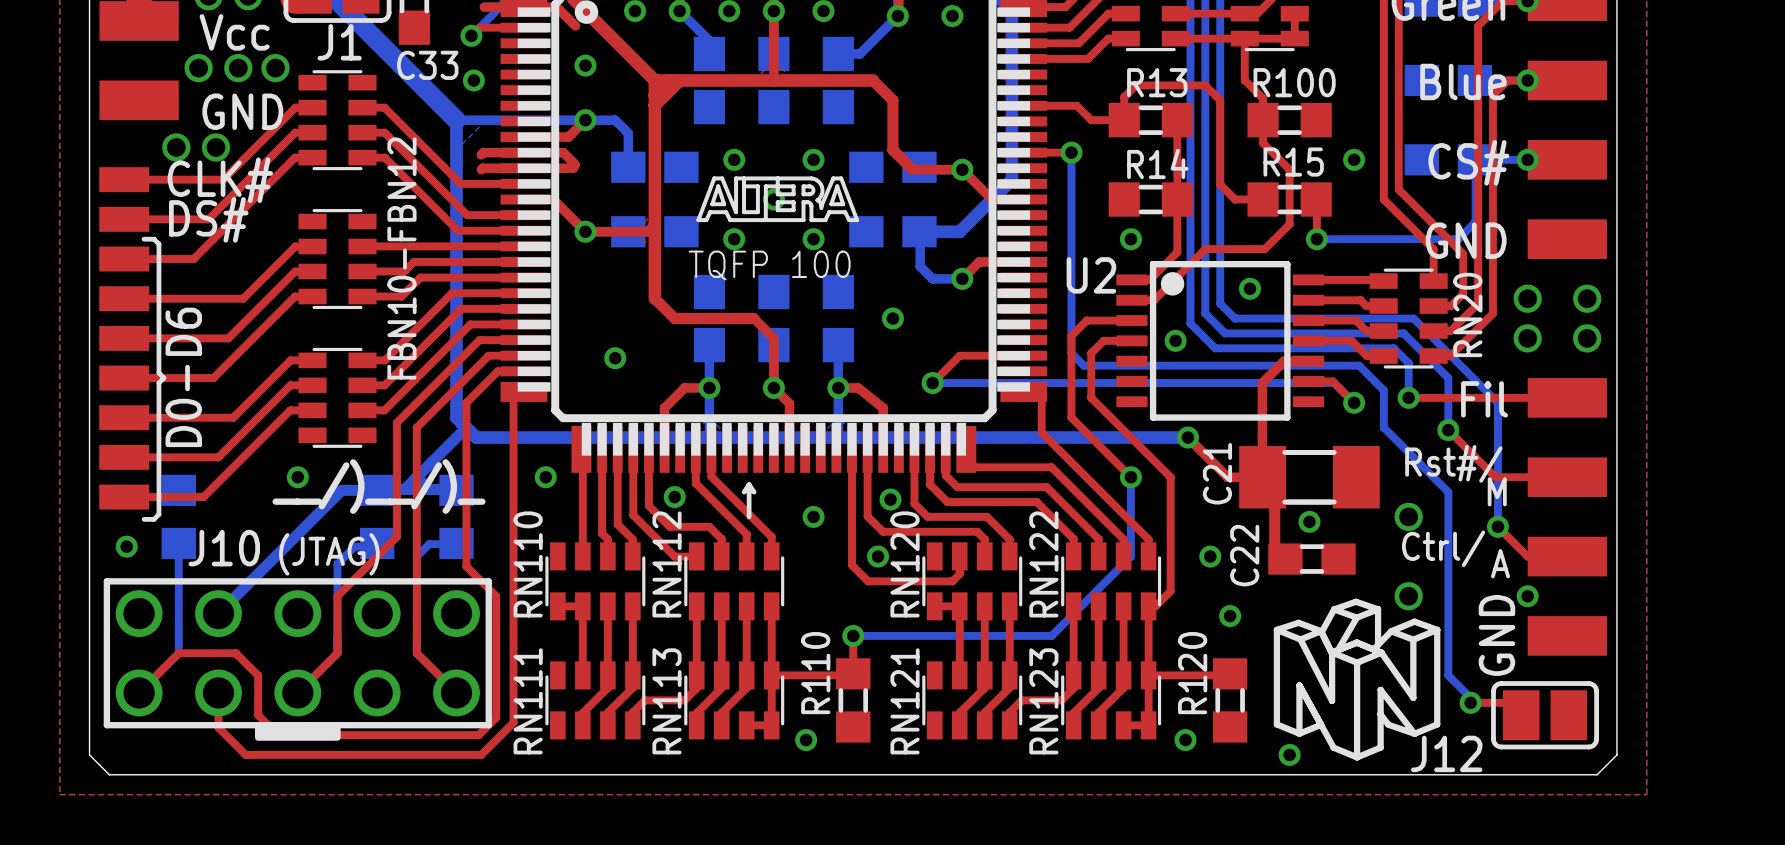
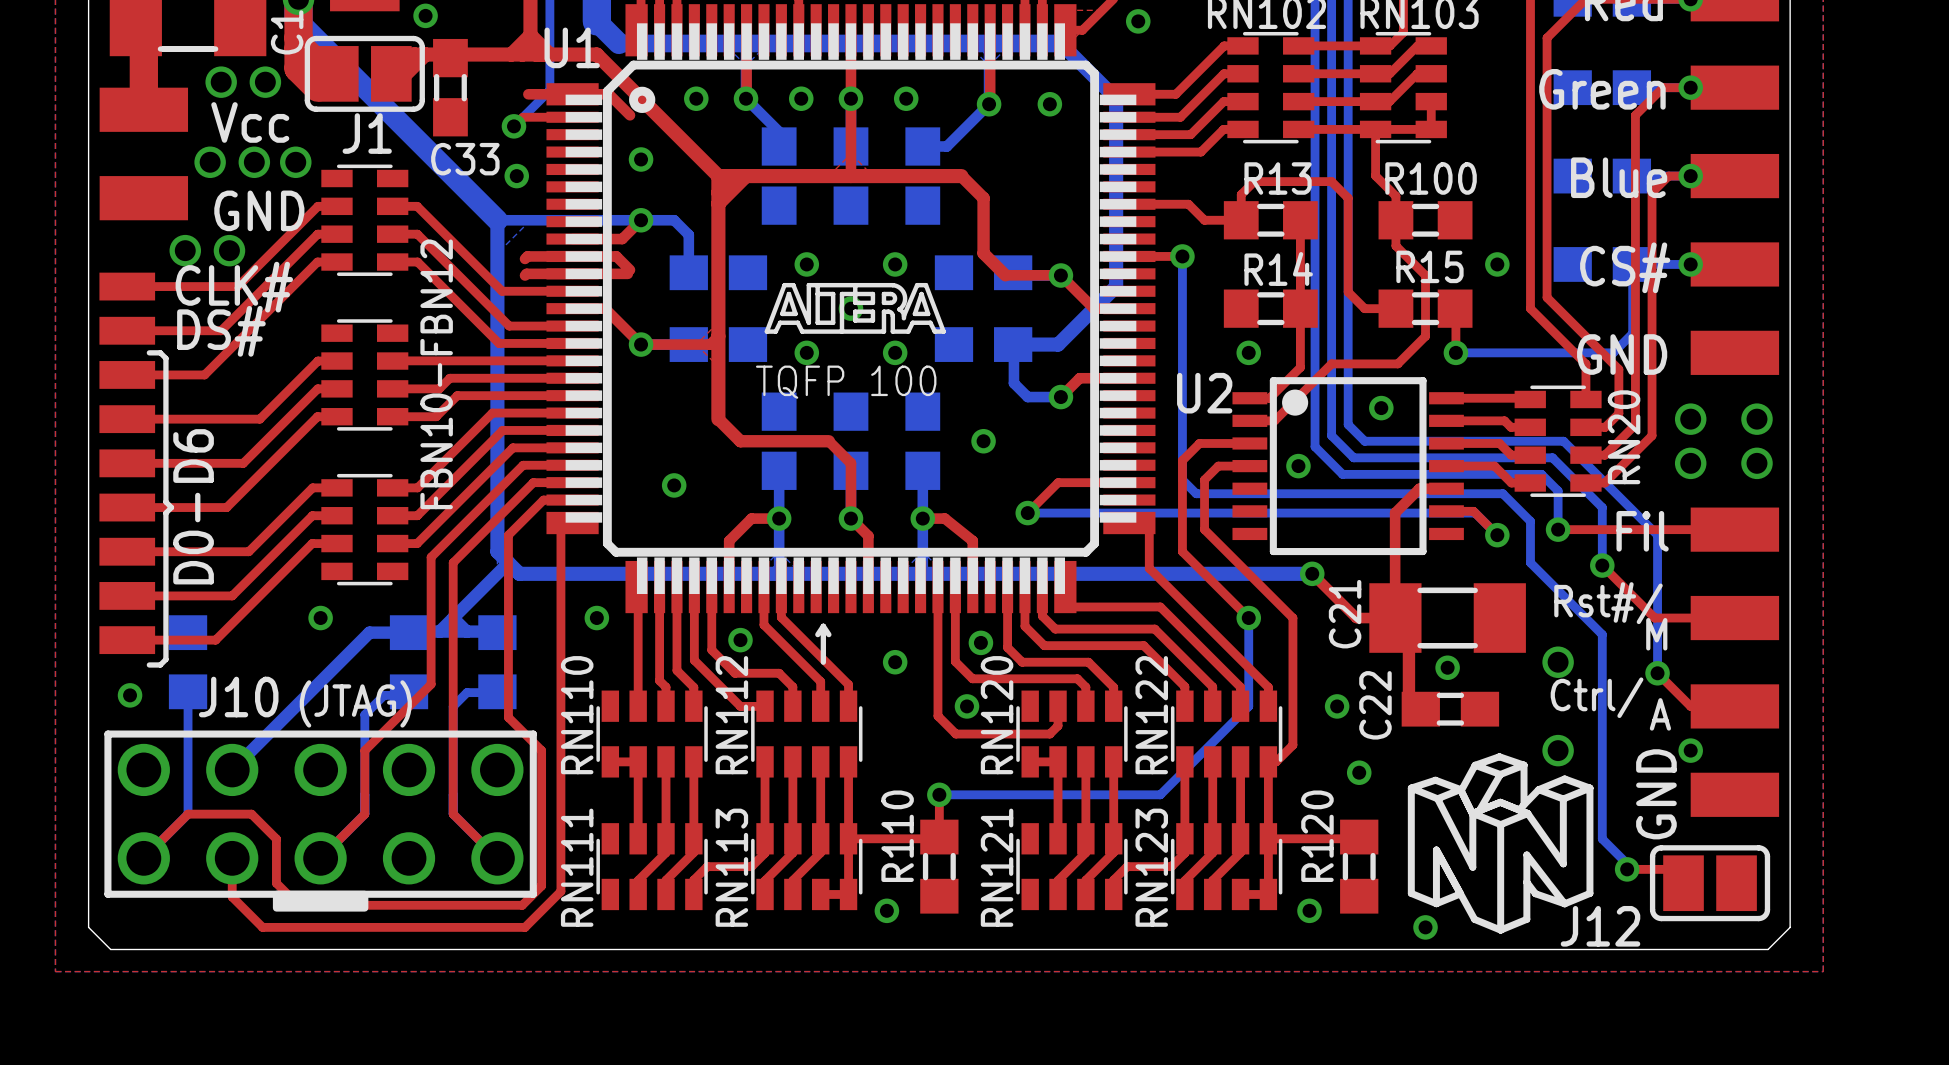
text: __/)__/)_ (379, 486) -> none

